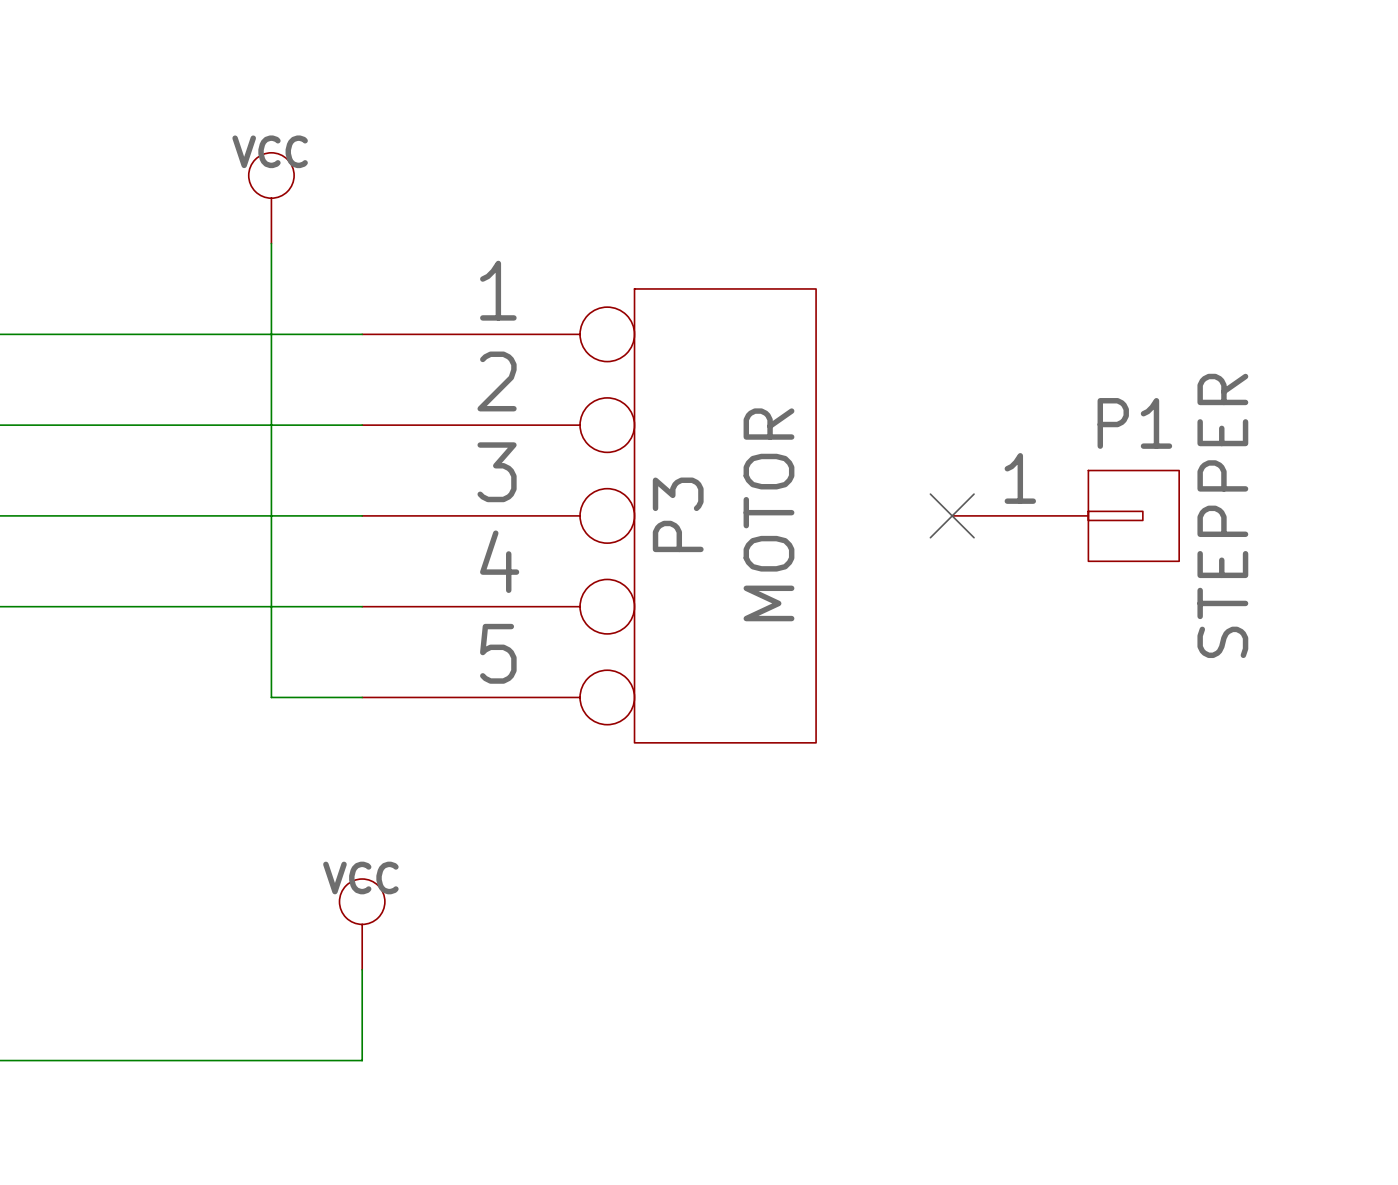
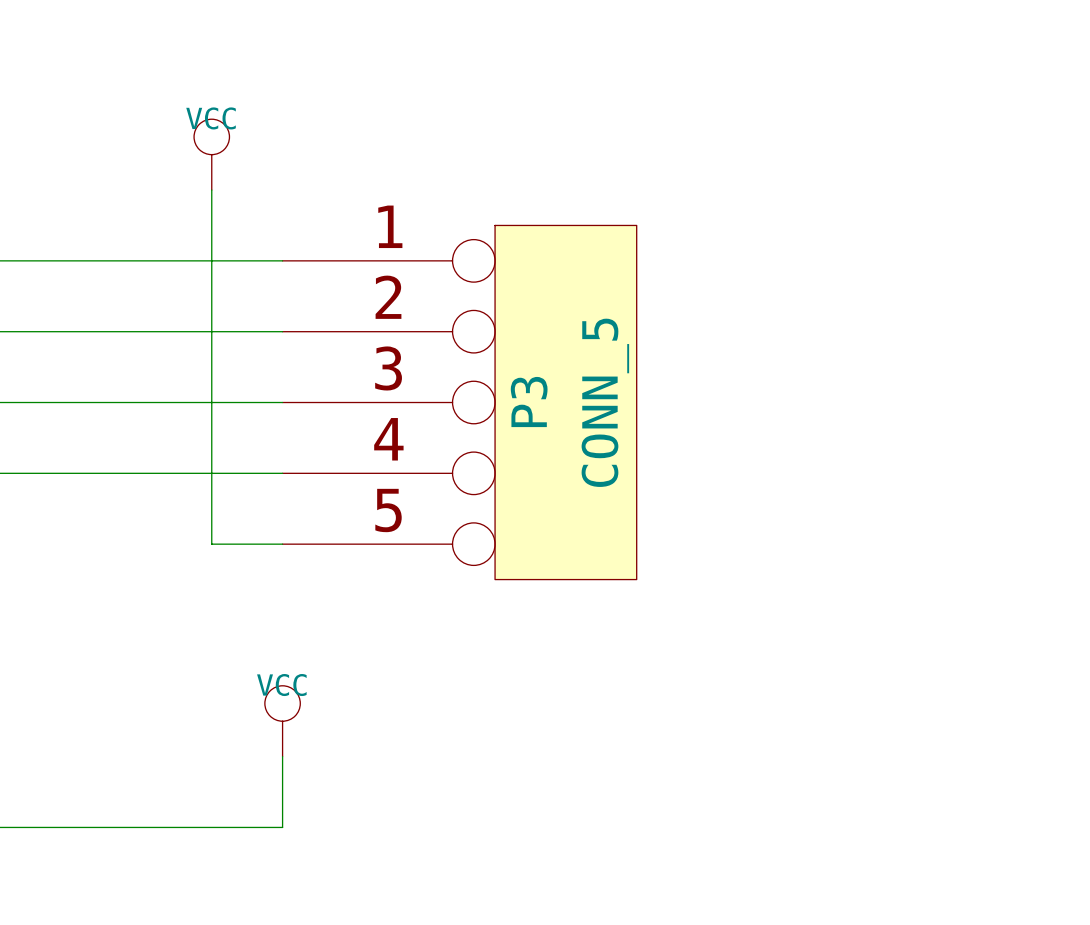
P3 value: MOTOR (768, 514) -> CONN_5 (605, 402)
no-connect mark: (952, 515) -> none
P1: STEPPER (1065, 515) -> none

